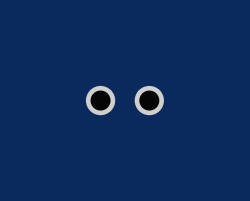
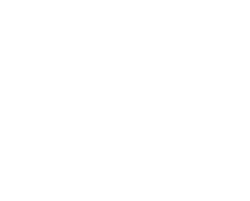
part: (124, 100) -> none

